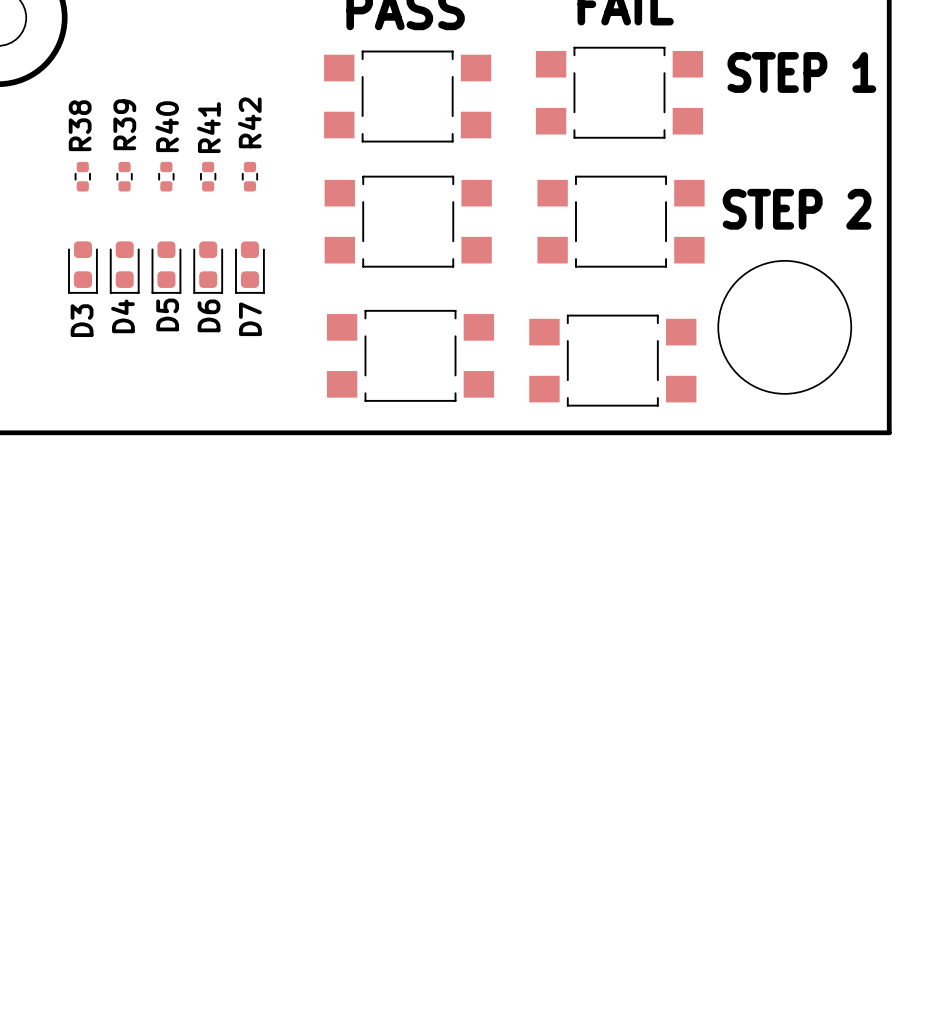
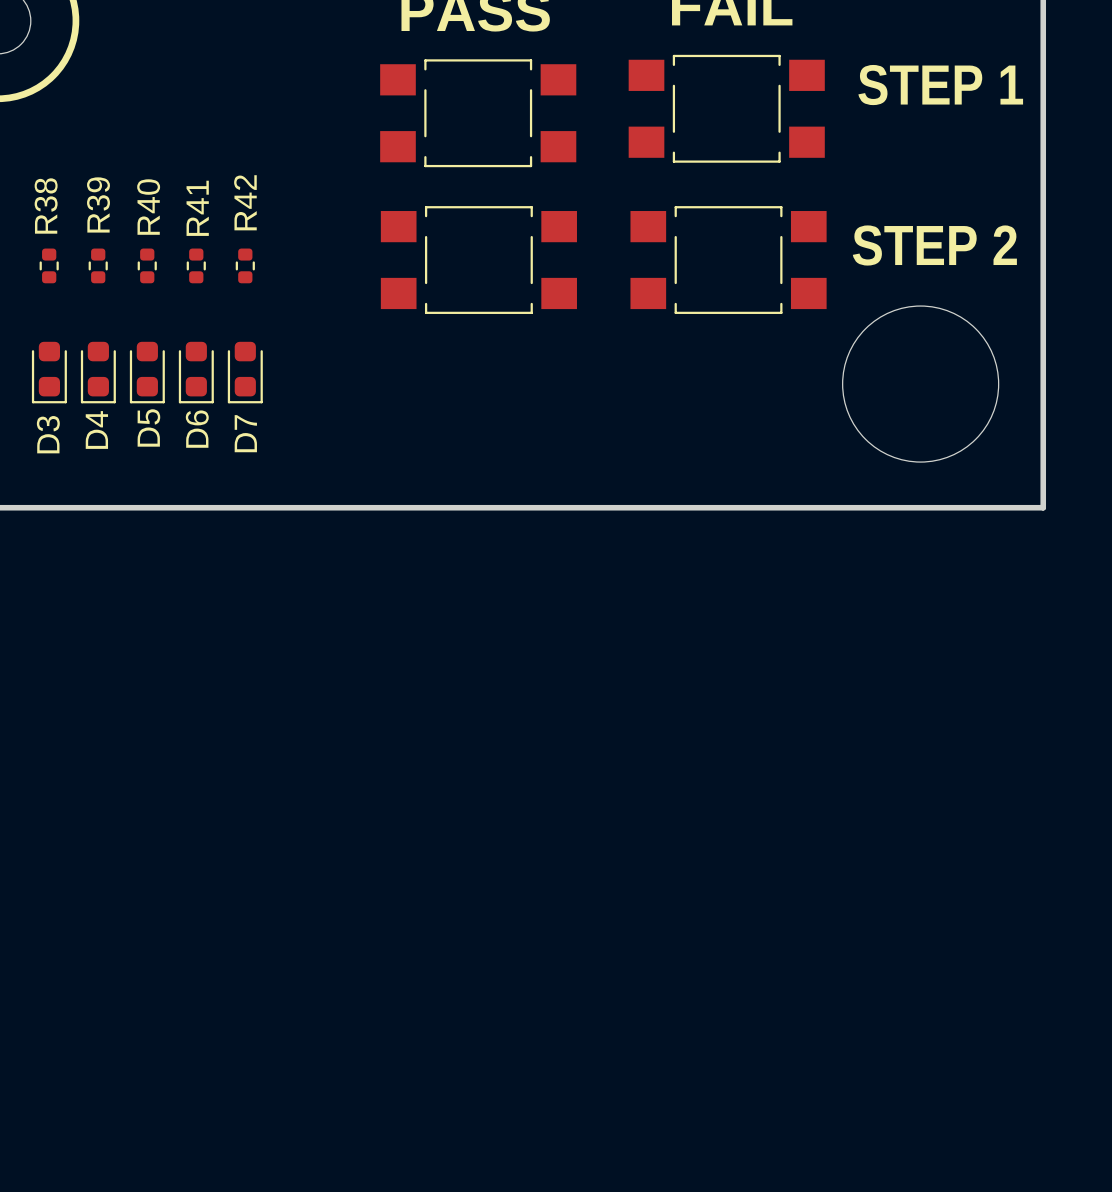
R38 position: (82, 176) -> (49, 265)
R39 position: (124, 176) -> (98, 265)
R40 position: (166, 176) -> (147, 265)
R41 position: (208, 176) -> (196, 265)
R42 position: (249, 176) -> (245, 265)
D3 position: (82, 267) -> (49, 372)
D4 position: (124, 267) -> (98, 372)
D5 position: (166, 267) -> (147, 372)
D6 position: (208, 267) -> (196, 372)
D7 position: (249, 267) -> (245, 372)
part: (410, 355) -> none
part: (612, 360) -> none

